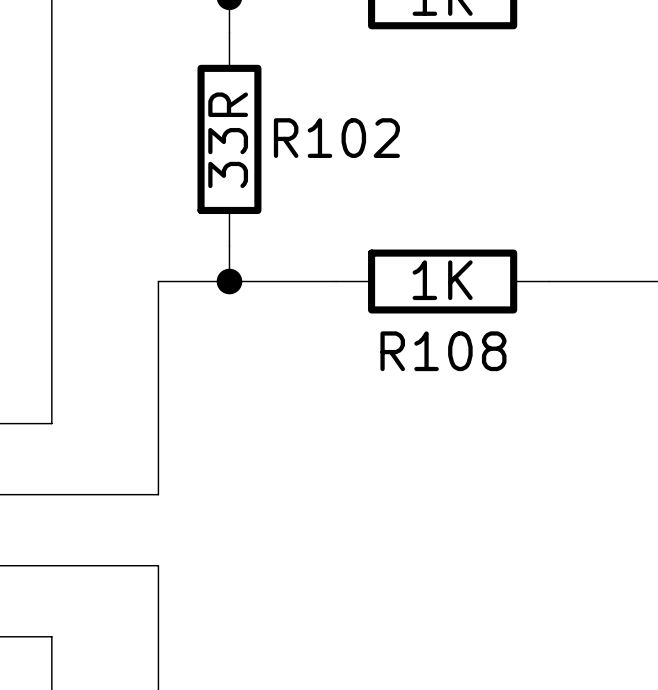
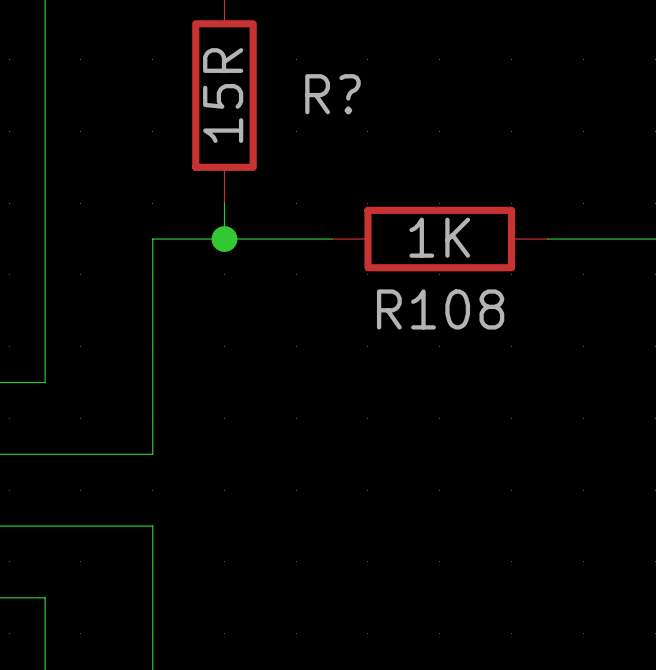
R102 name: R102 (336, 138) -> R? (332, 94)
R102 value: 33R (228, 140) -> 15R (223, 95)

